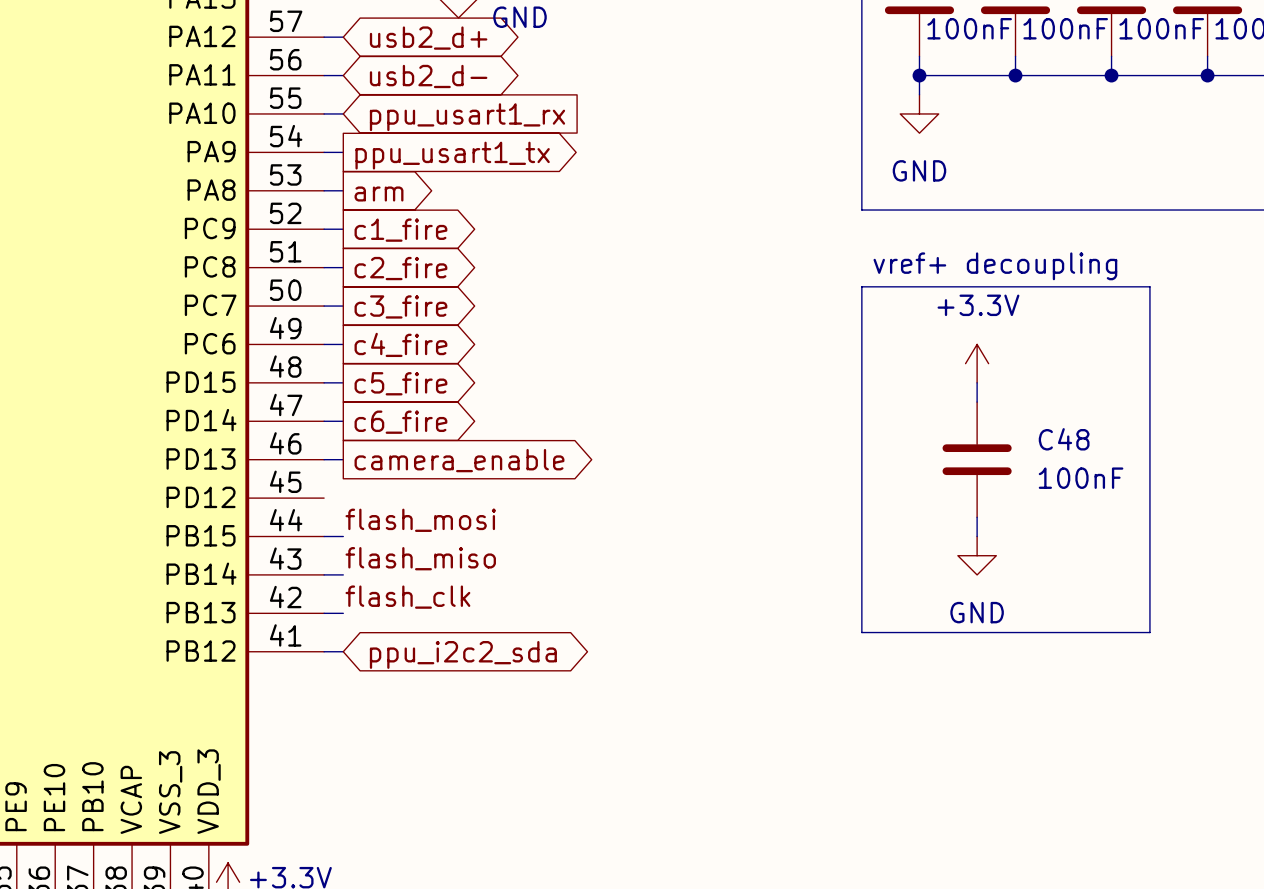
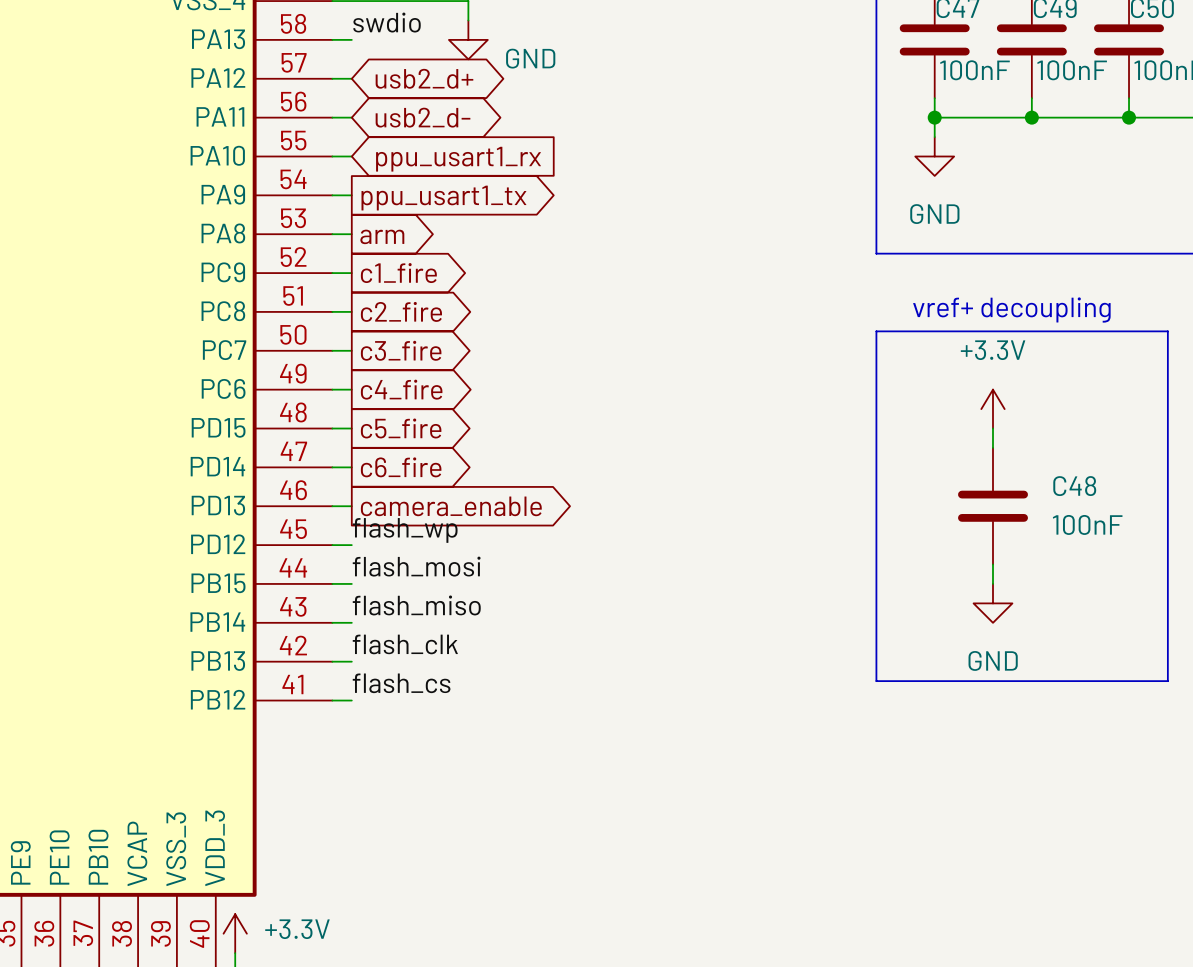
label: none -> flash_wp (405, 530)
wire: none -> (332, 545) (351, 545)
label: none -> flash_cs (401, 683)
global label: ppu_i2c2_sda (463, 654) -> none

